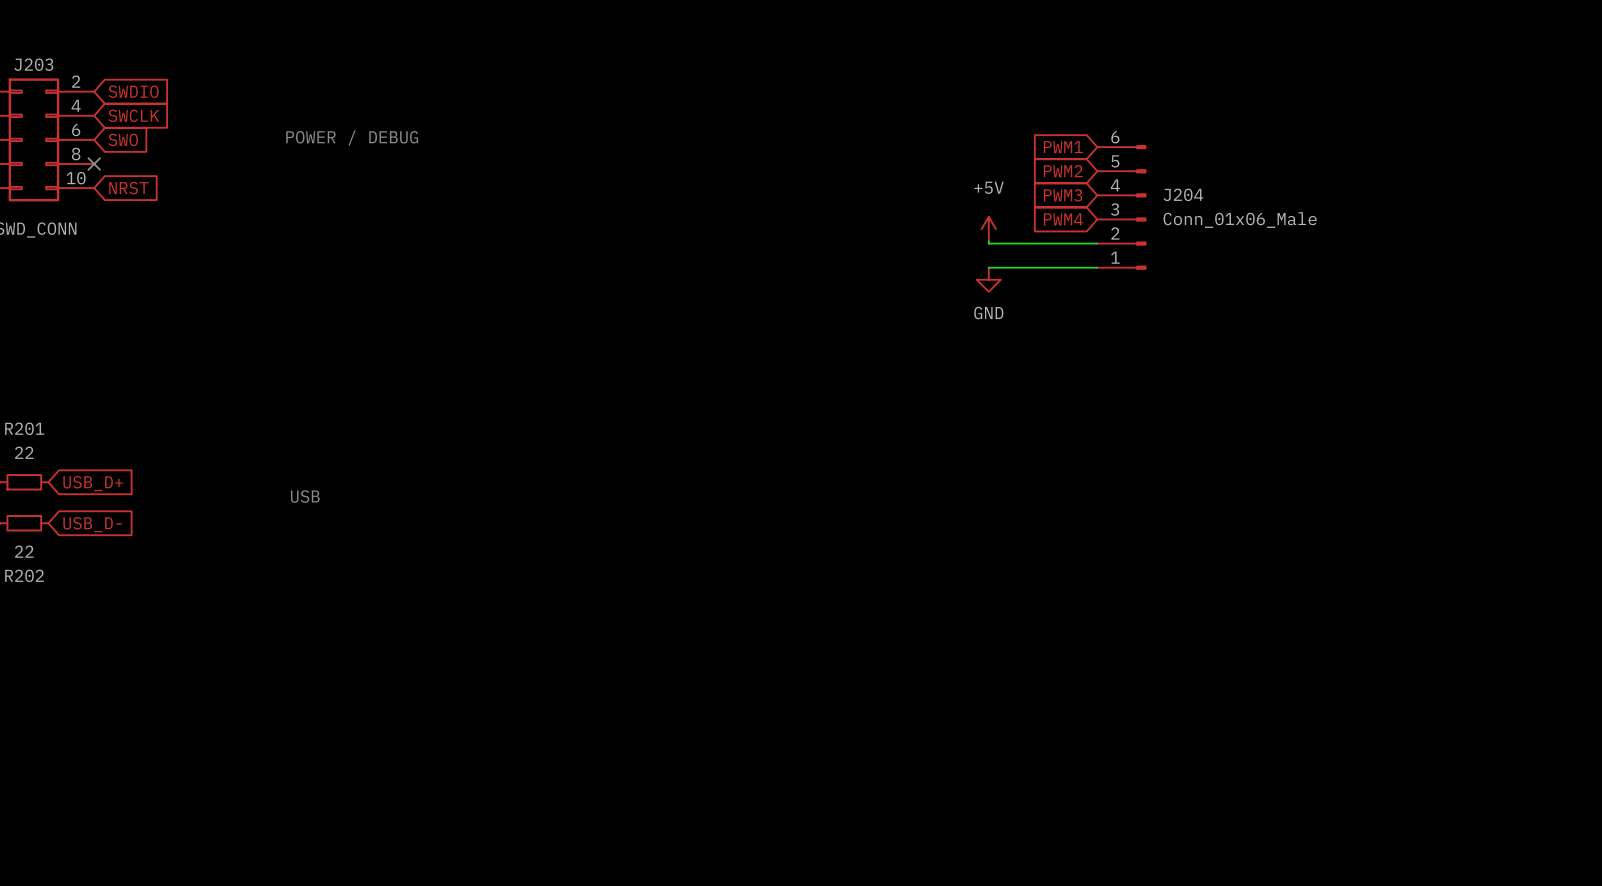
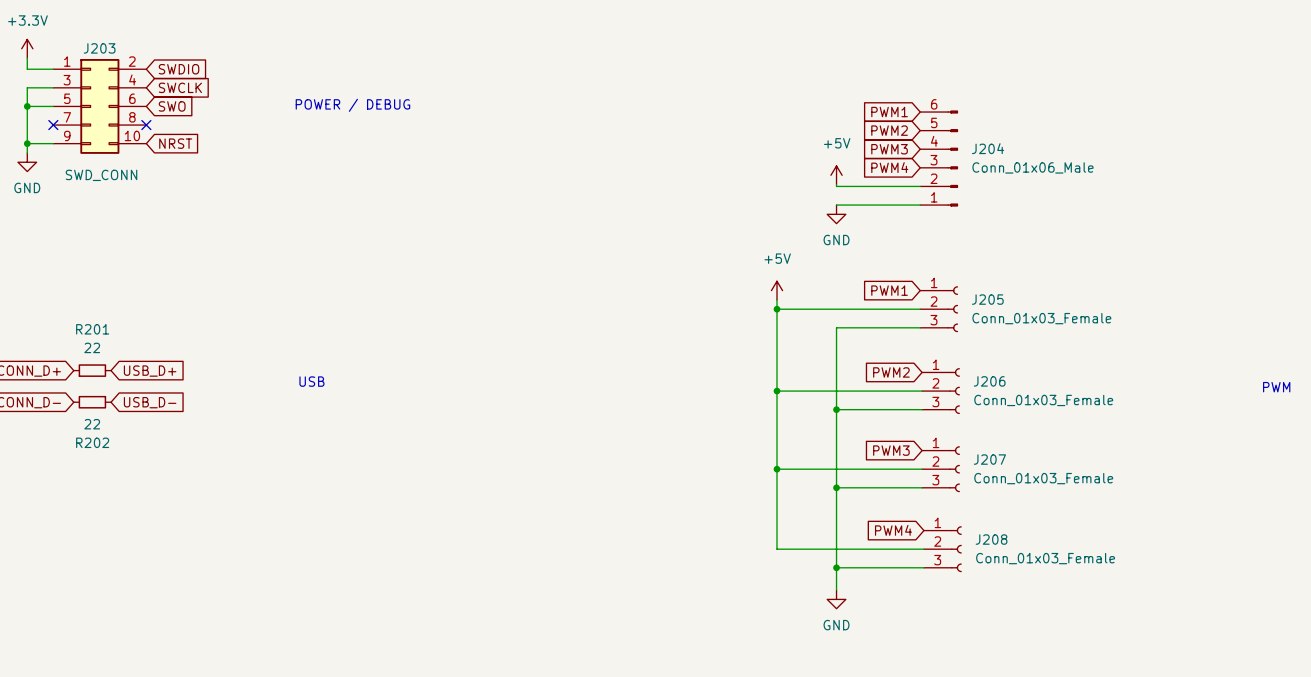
power symbol: none -> +5V (777, 290)
global label: none -> PWM1 (889, 290)
wire: none -> (777, 299) (777, 549) (923, 549)
wire: none -> (777, 309) (920, 309)
junction: none -> (777, 309)
J205: none -> Conn_01x03_Female (939, 309)
wire: none -> (920, 327) (836, 327) (836, 590)
global label: none -> PWM2 (891, 372)
text: none -> PWM (1276, 387)
wire: none -> (777, 391) (922, 391)
junction: none -> (777, 391)
J206: none -> Conn_01x03_Female (940, 391)
wire: none -> (836, 409) (922, 409)
junction: none -> (836, 409)
global label: none -> PWM3 (891, 450)
wire: none -> (777, 469) (922, 469)
junction: none -> (777, 469)
J207: none -> Conn_01x03_Female (940, 469)
wire: none -> (836, 487) (922, 487)
junction: none -> (836, 487)
global label: none -> PWM4 (893, 530)
J208: none -> Conn_01x03_Female (942, 549)
wire: none -> (836, 567) (923, 567)
junction: none -> (836, 567)
power symbol: none -> GND (836, 599)

